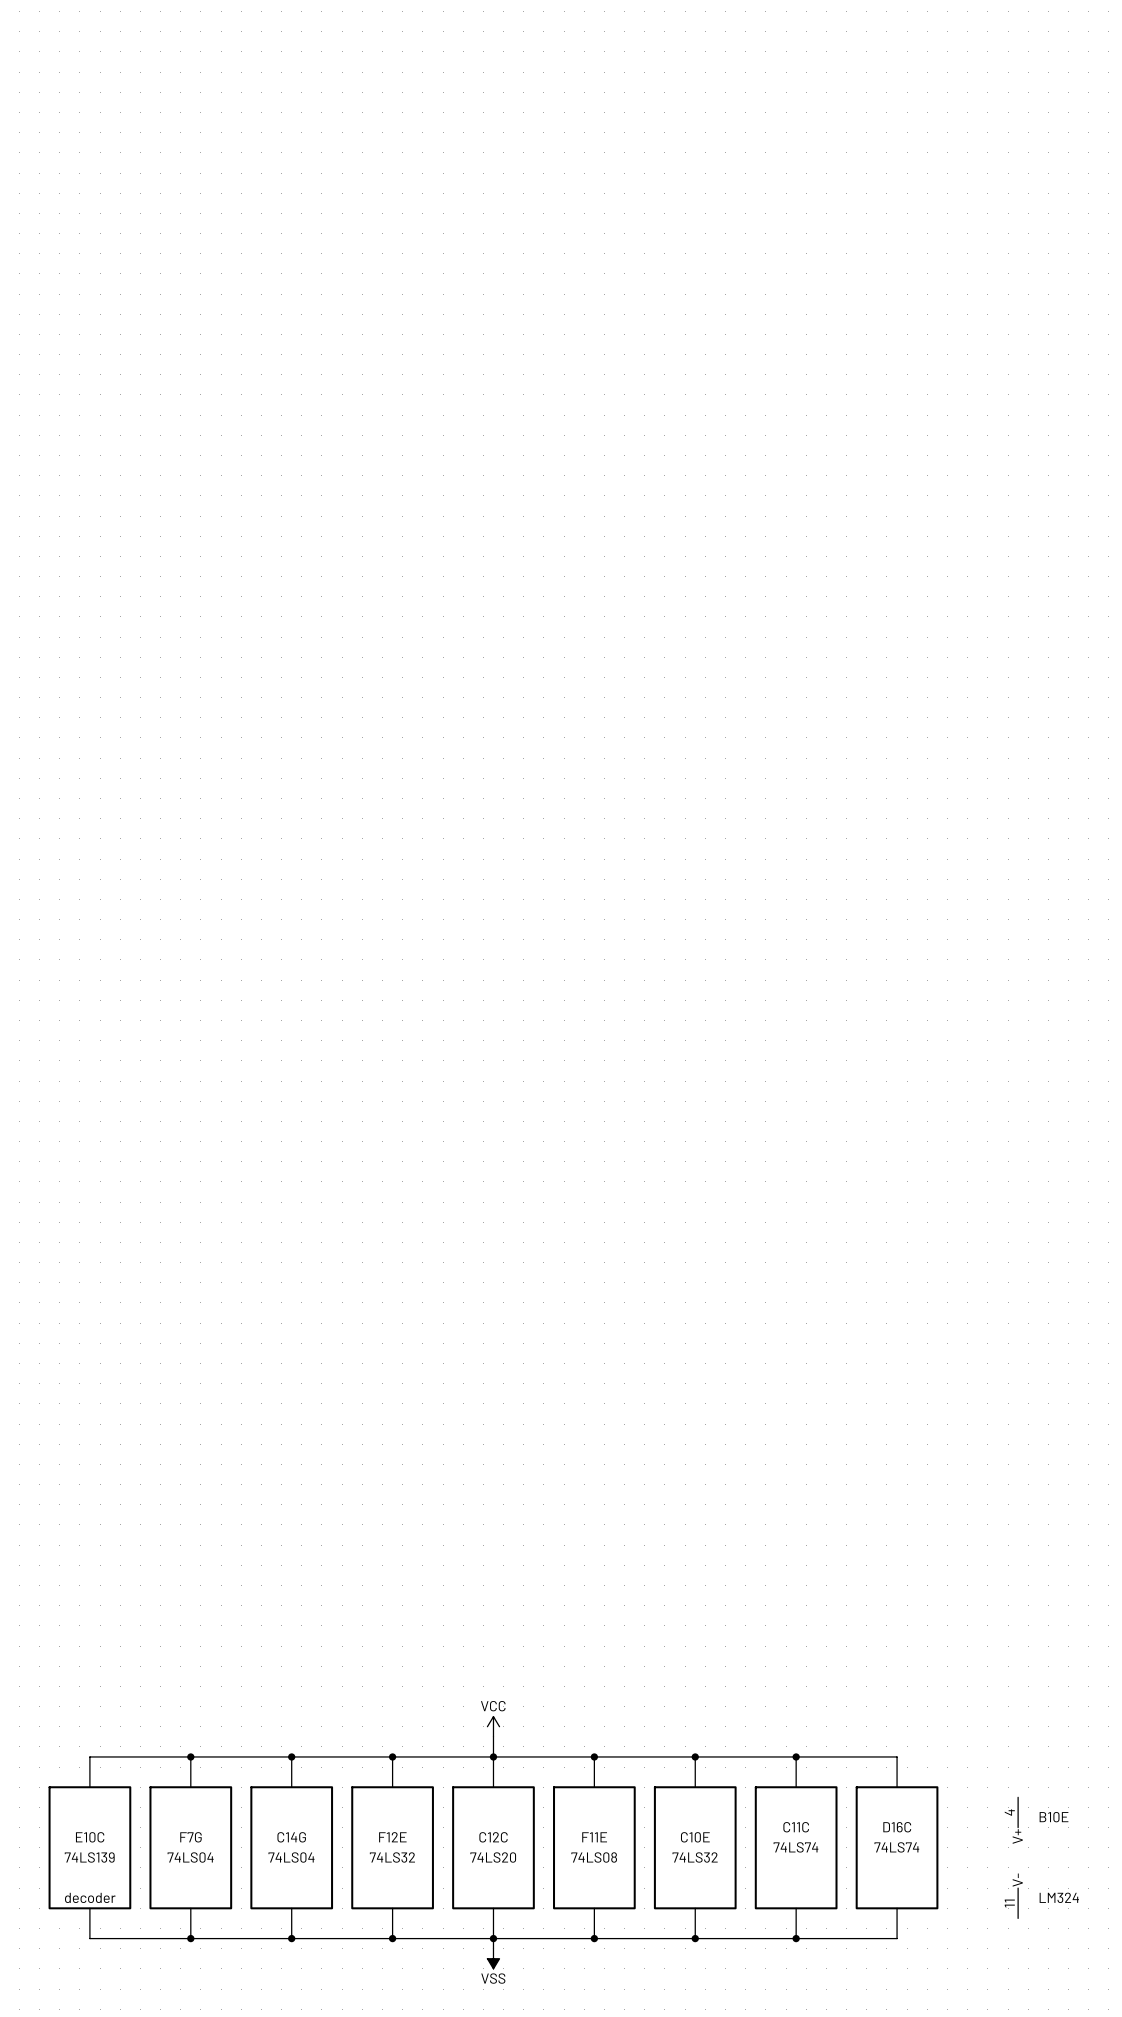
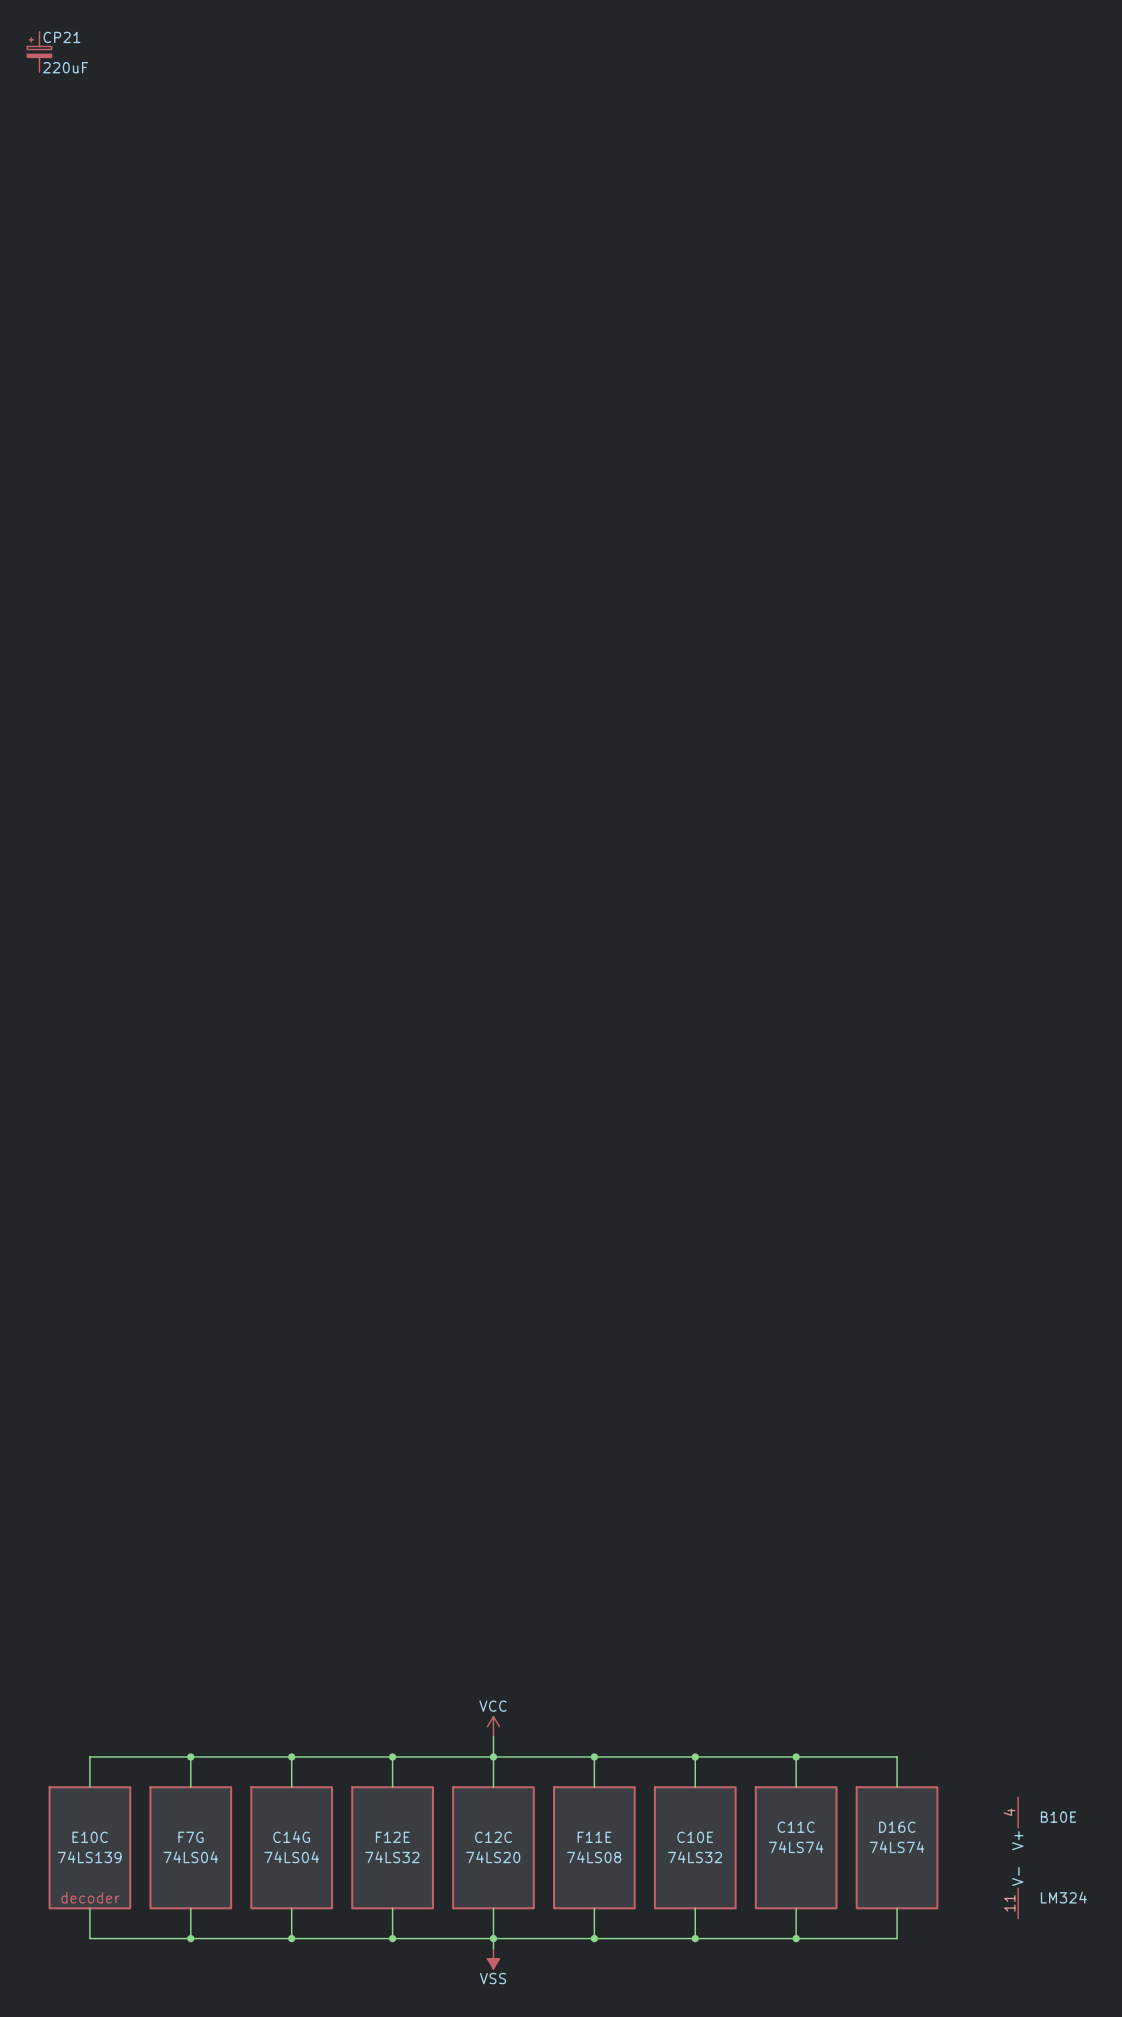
CP21: none -> 220uF (39, 51)

